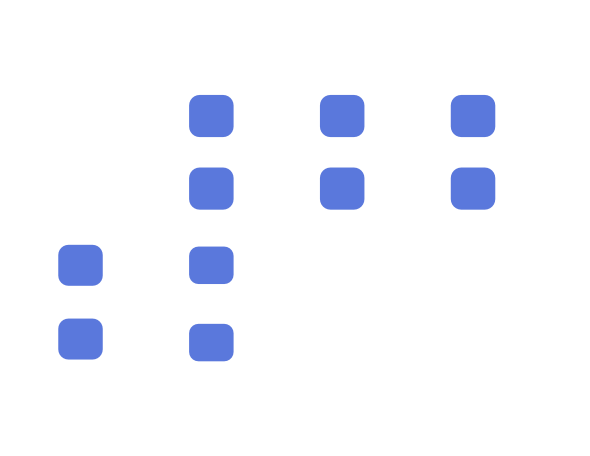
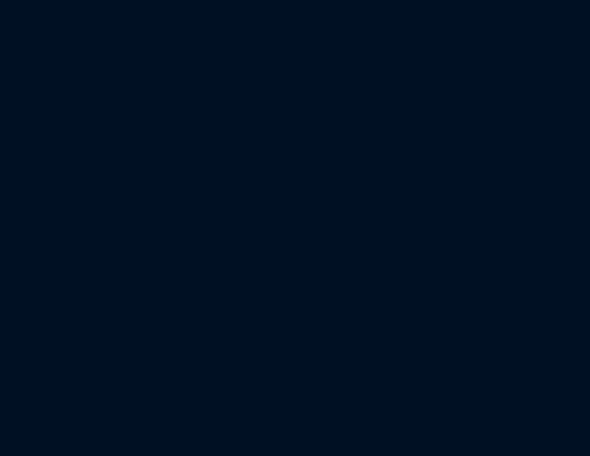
part: (211, 152) -> none
part: (342, 152) -> none
part: (473, 152) -> none
part: (80, 302) -> none
part: (211, 303) -> none

